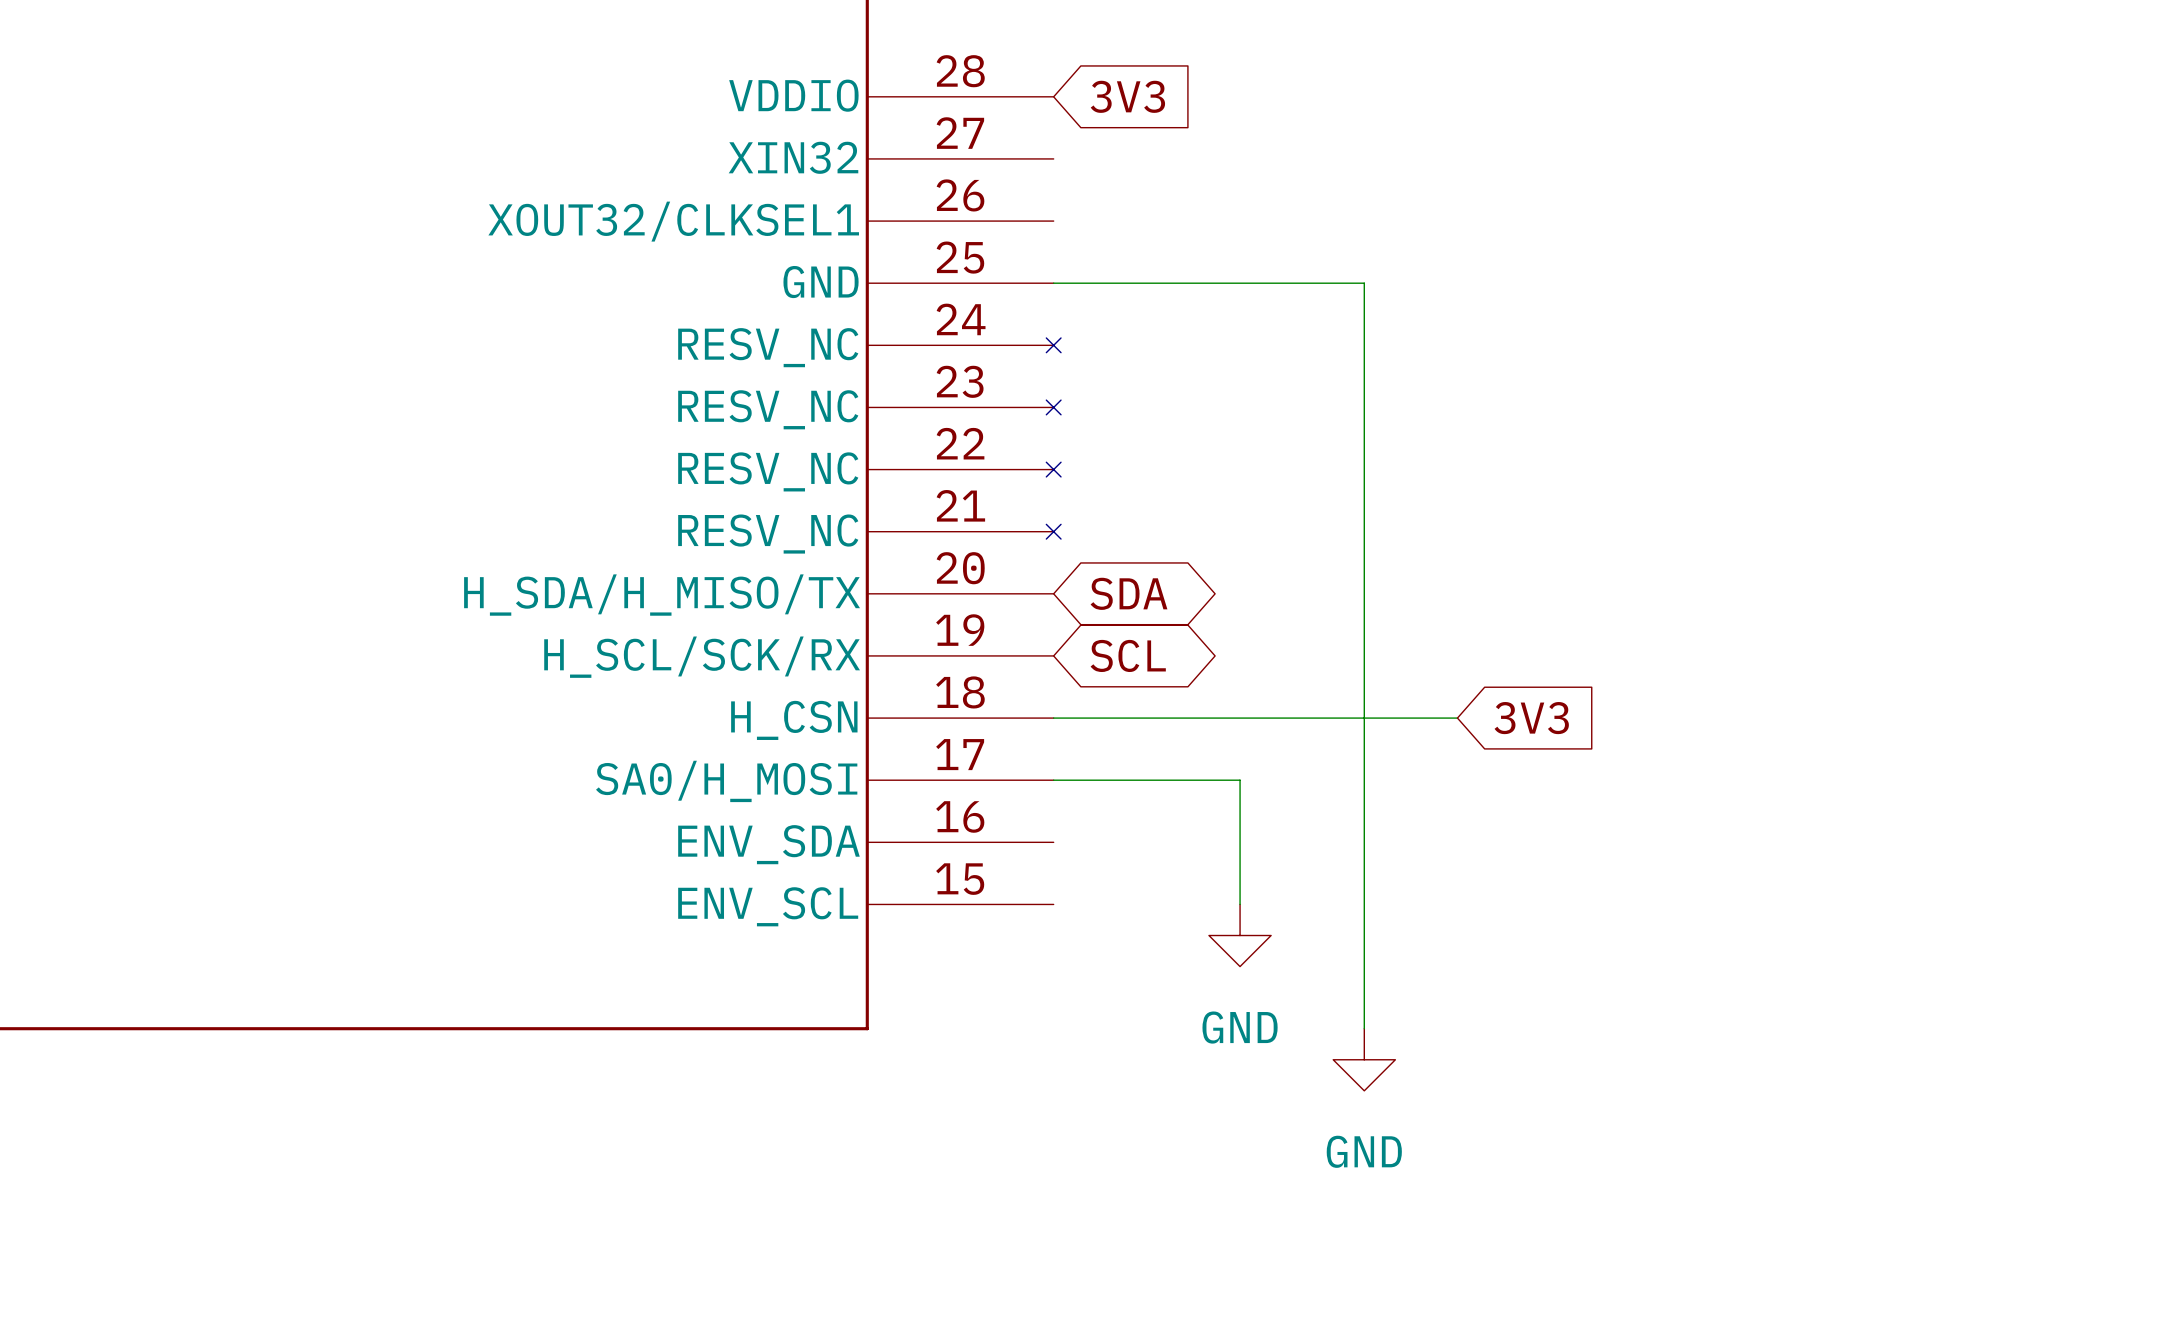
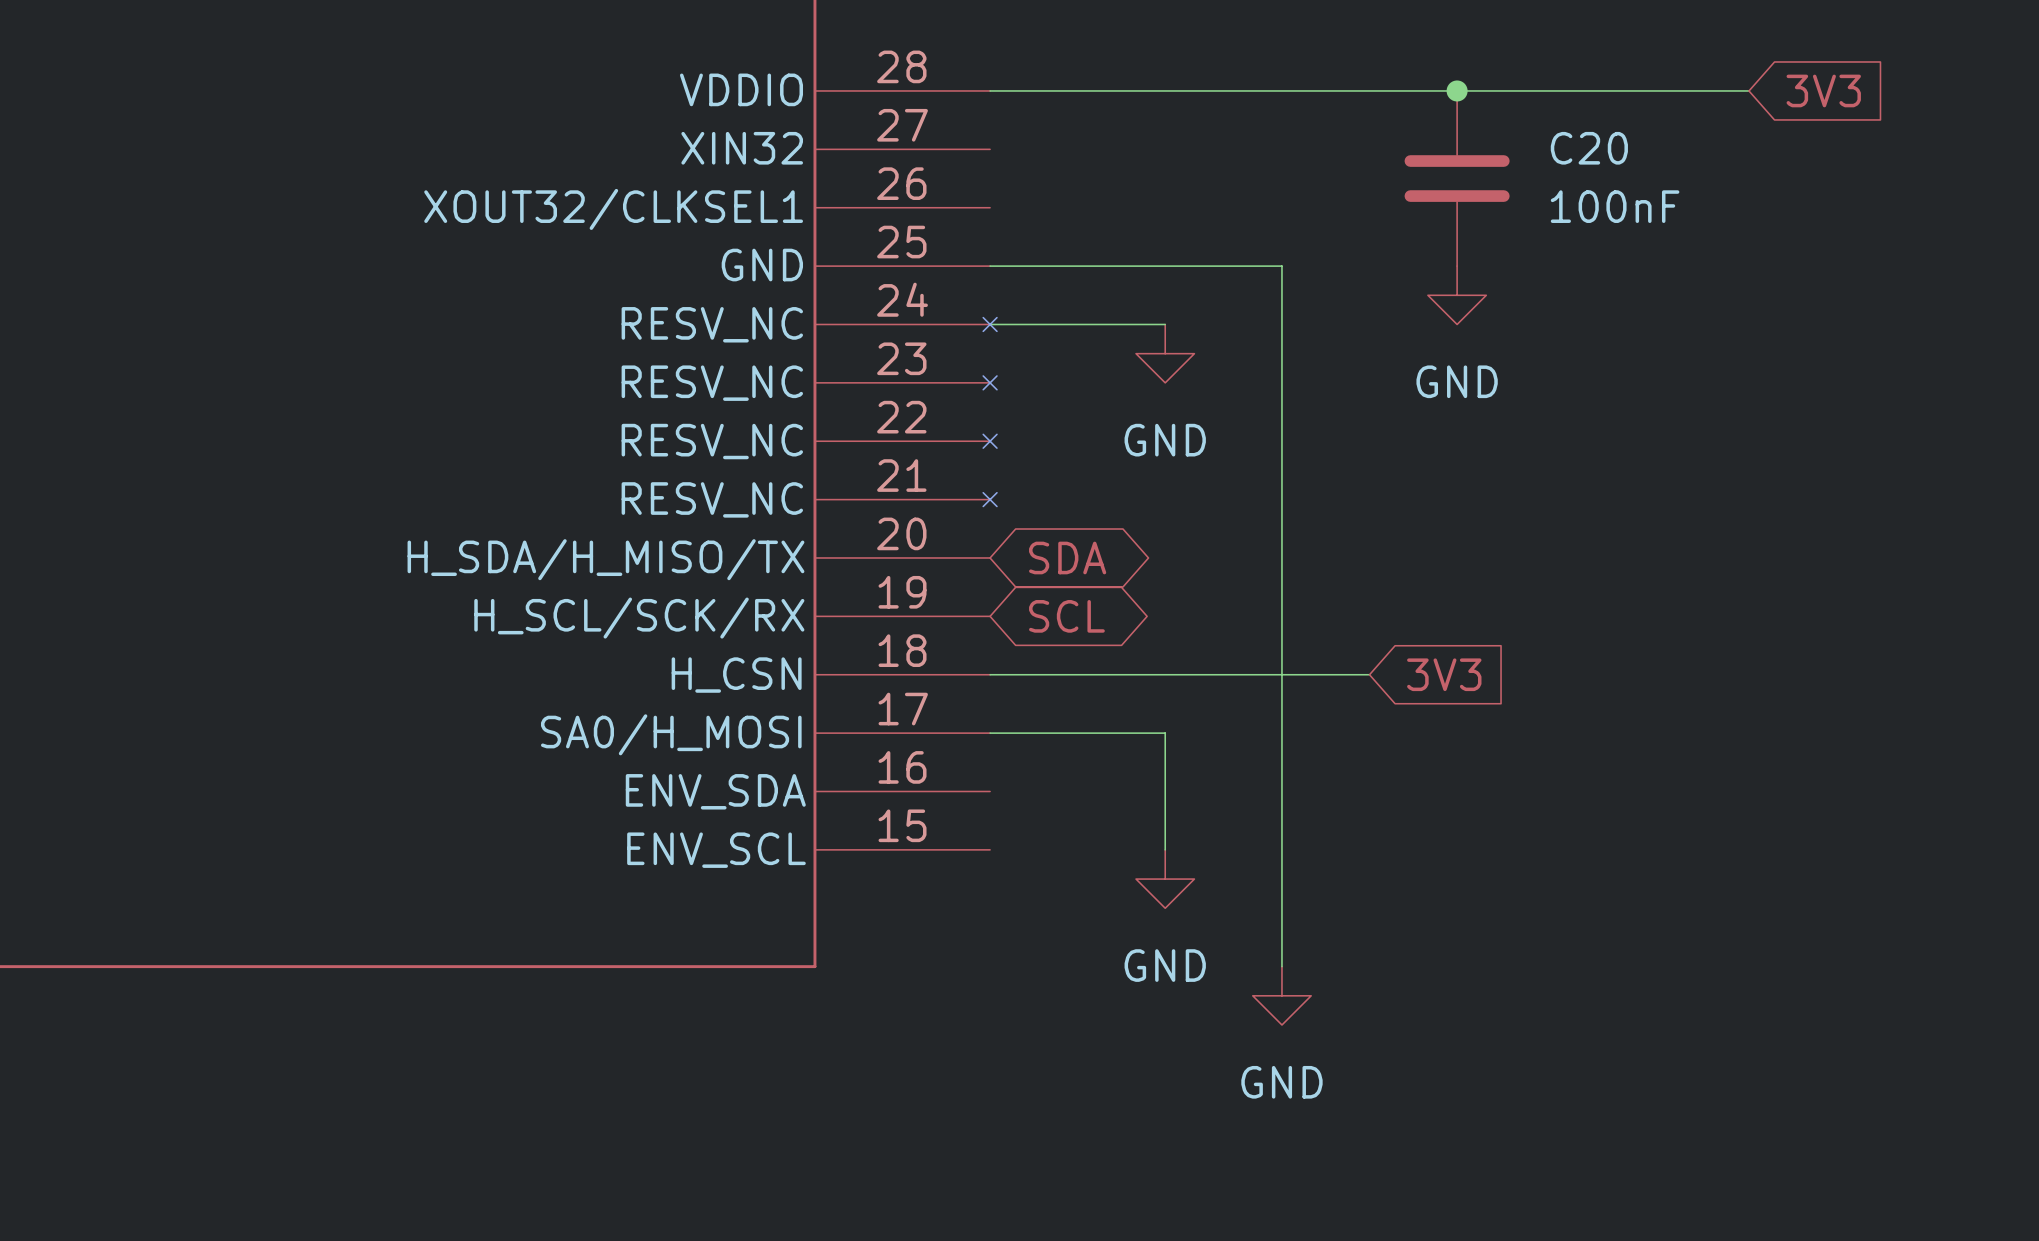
wire: none -> (990, 90) (1748, 90)
global label: 3V3 (1127, 96) -> none
junction: none -> (1457, 90)
global label: none -> 3V3 (1823, 90)
C20: none -> 100nF (1457, 178)
power symbol: none -> GND (1457, 295)
wire: none -> (990, 324) (1165, 324)
power symbol: none -> GND (1165, 353)

